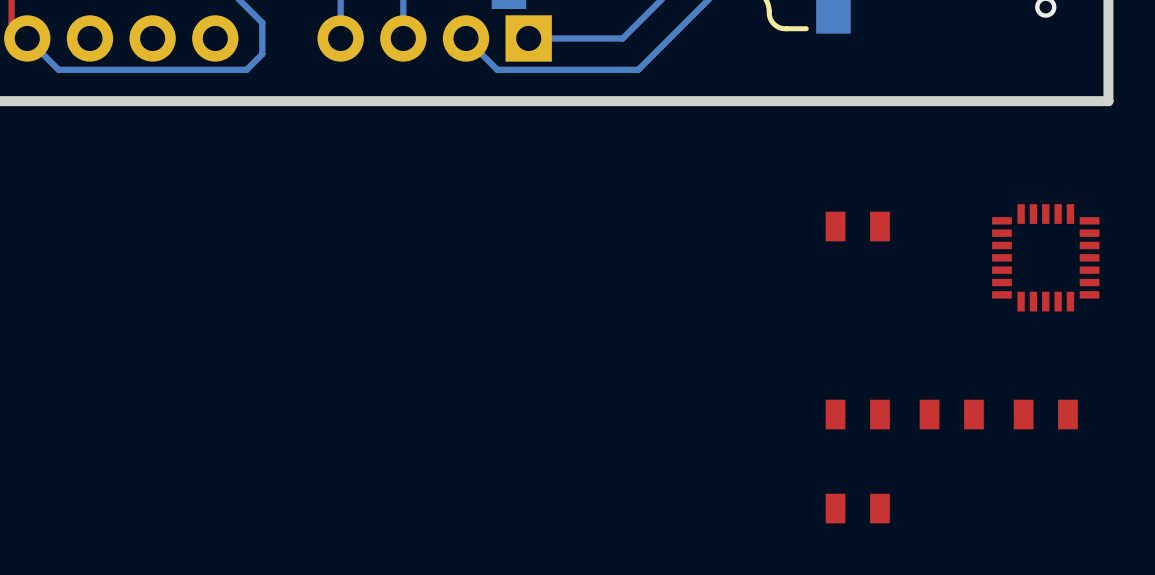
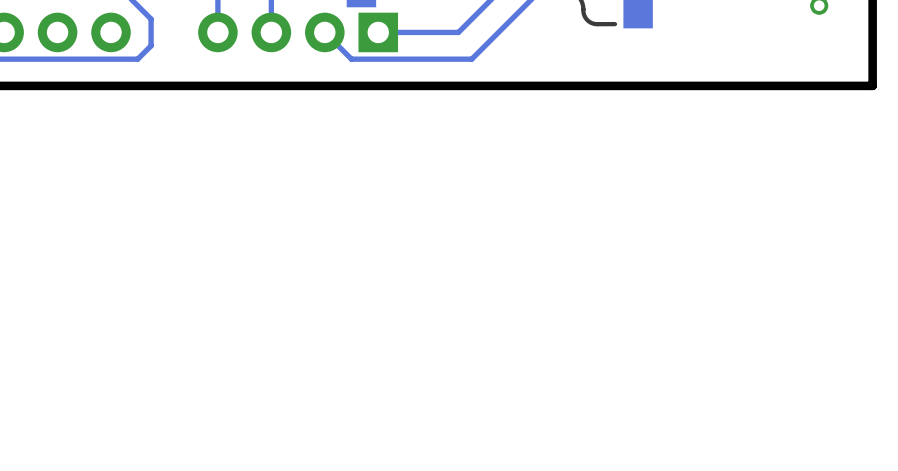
part: (857, 226) -> none
part: (1045, 257) -> none
part: (857, 414) -> none
part: (951, 414) -> none
part: (1045, 414) -> none
part: (857, 508) -> none

